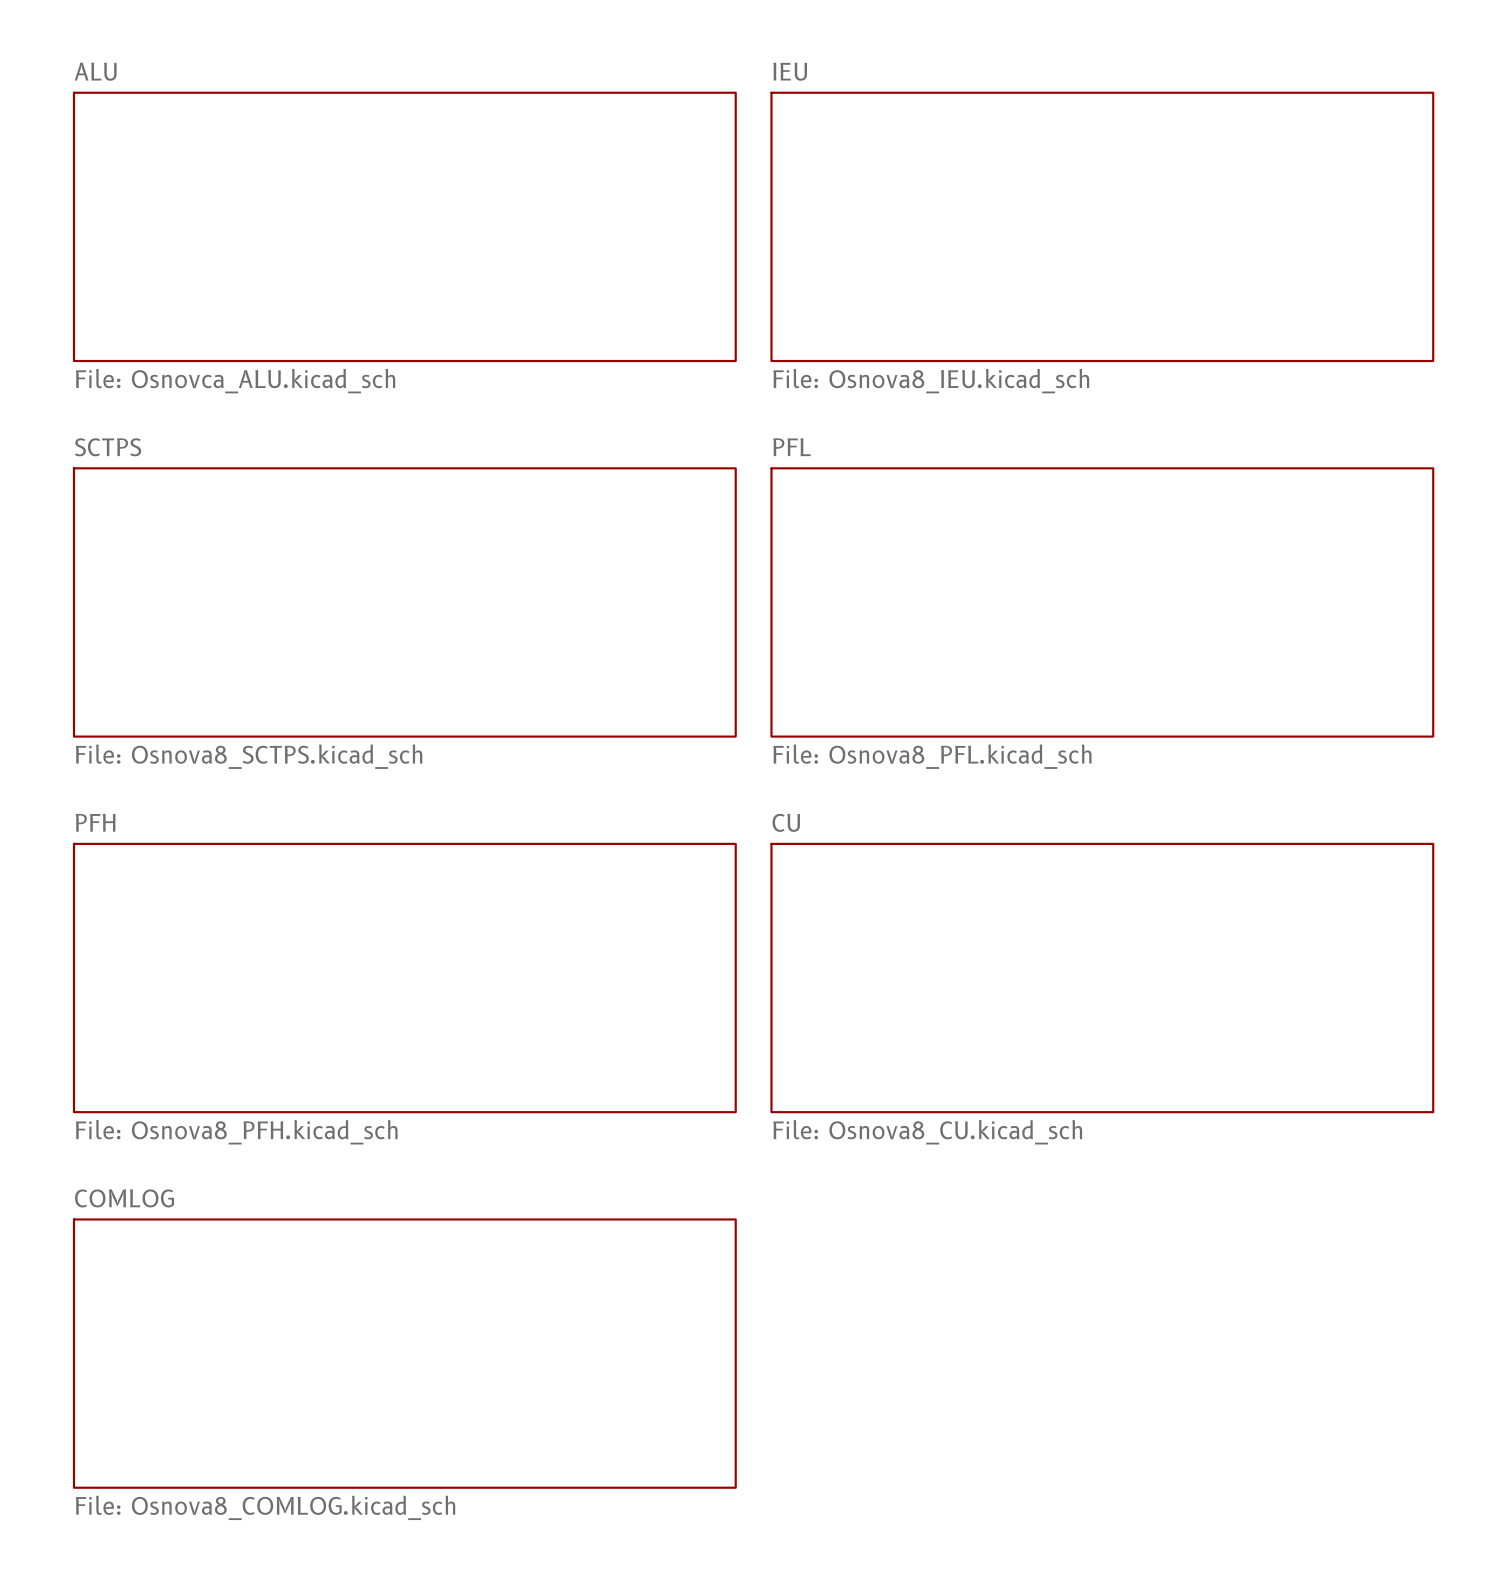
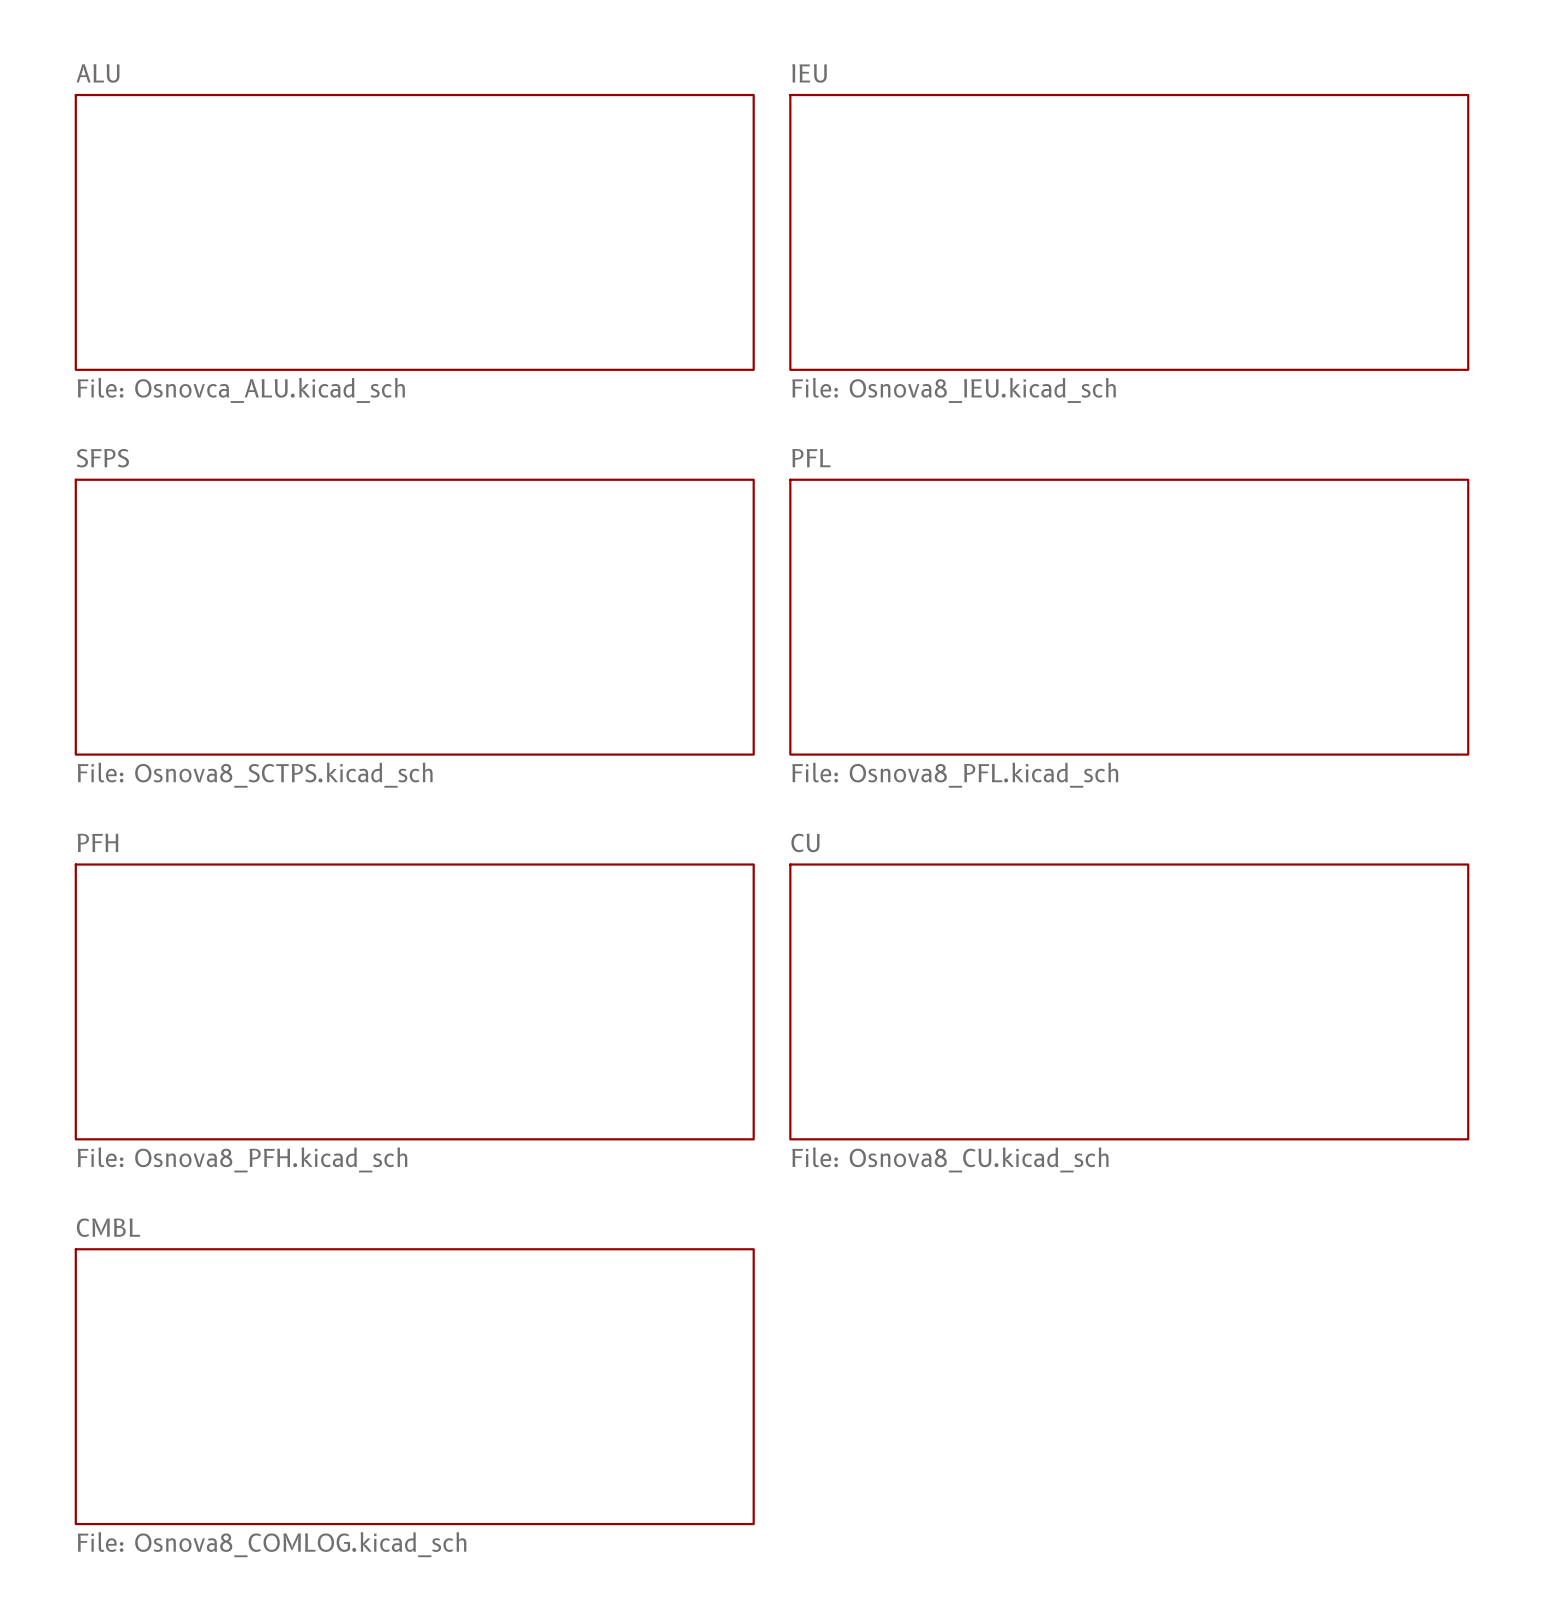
sheet SCTPS name: SCTPS (108, 447) -> SFPS (102, 458)
sheet COMLOG name: COMLOG (124, 1198) -> CMBL (108, 1227)

